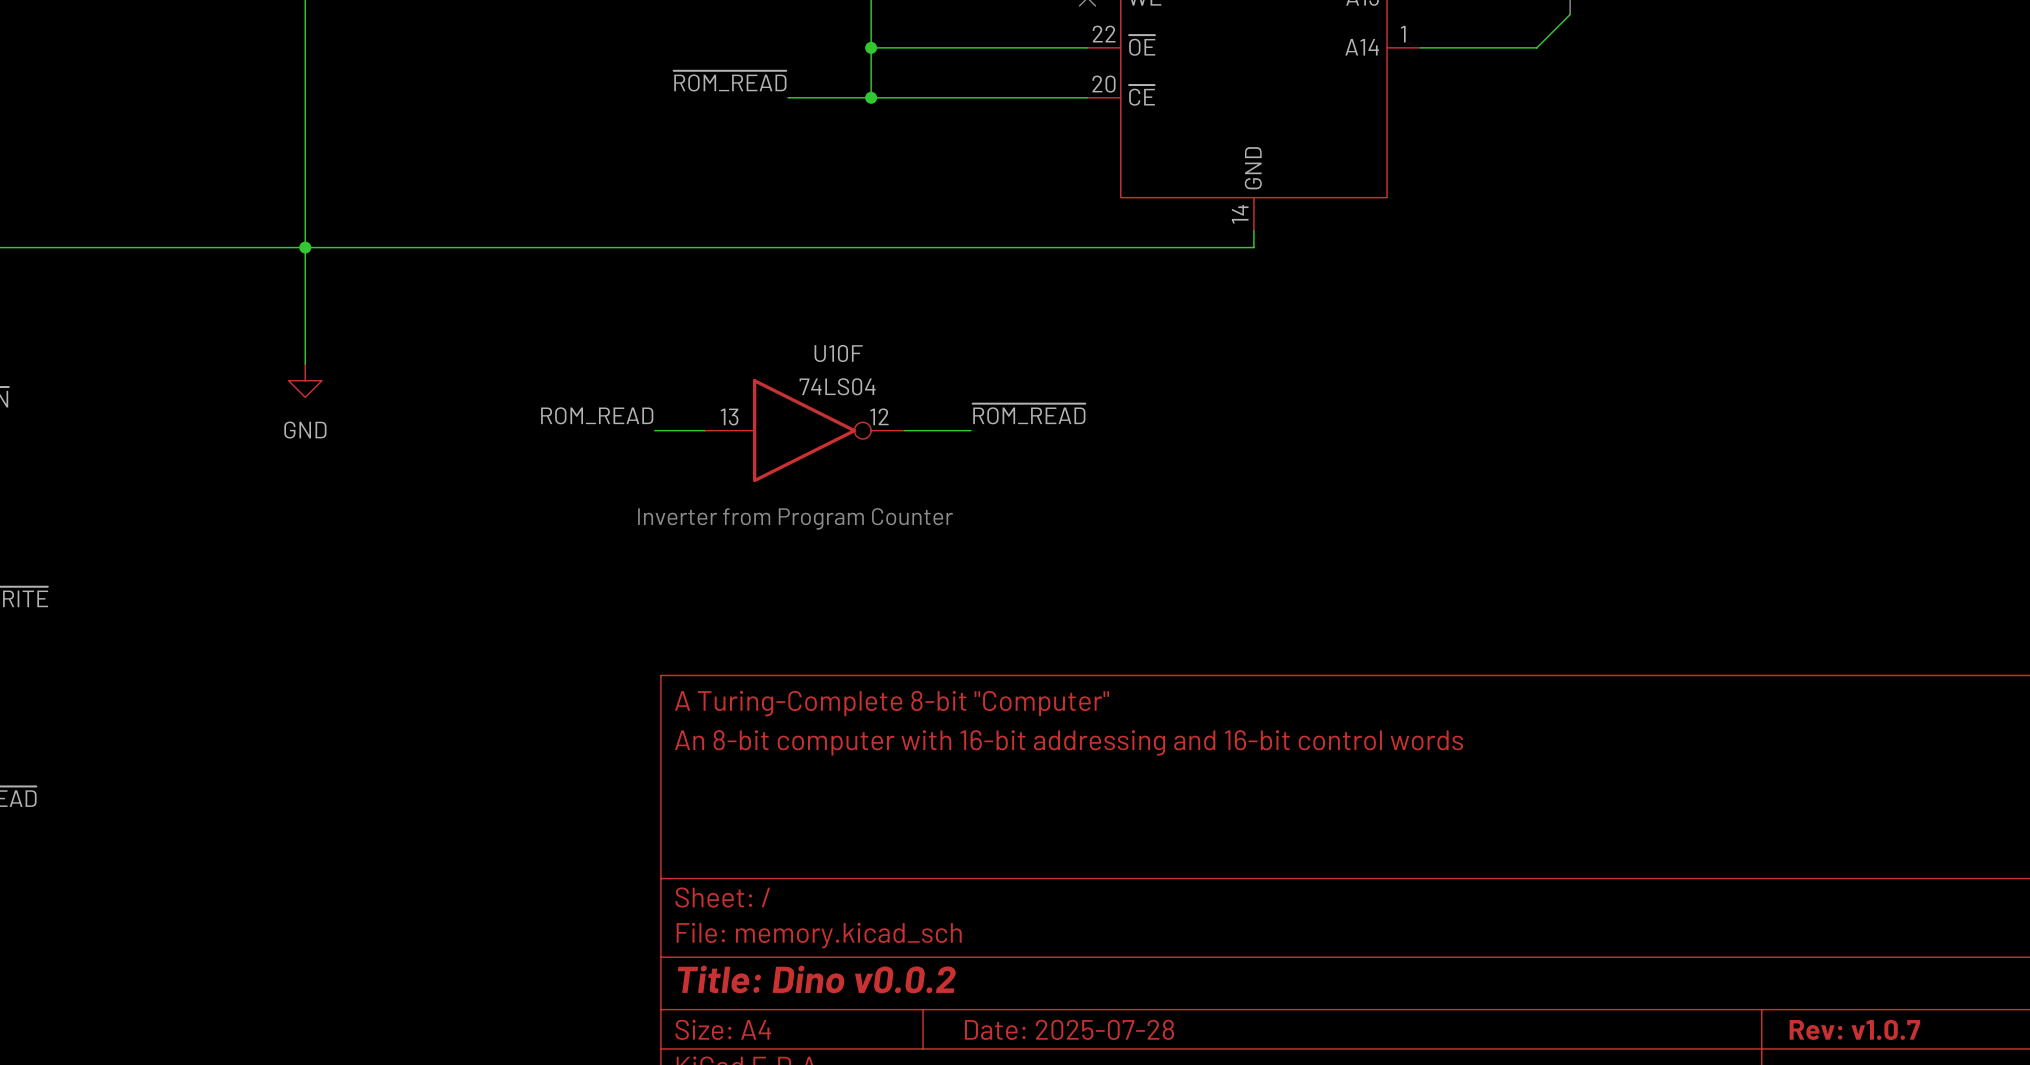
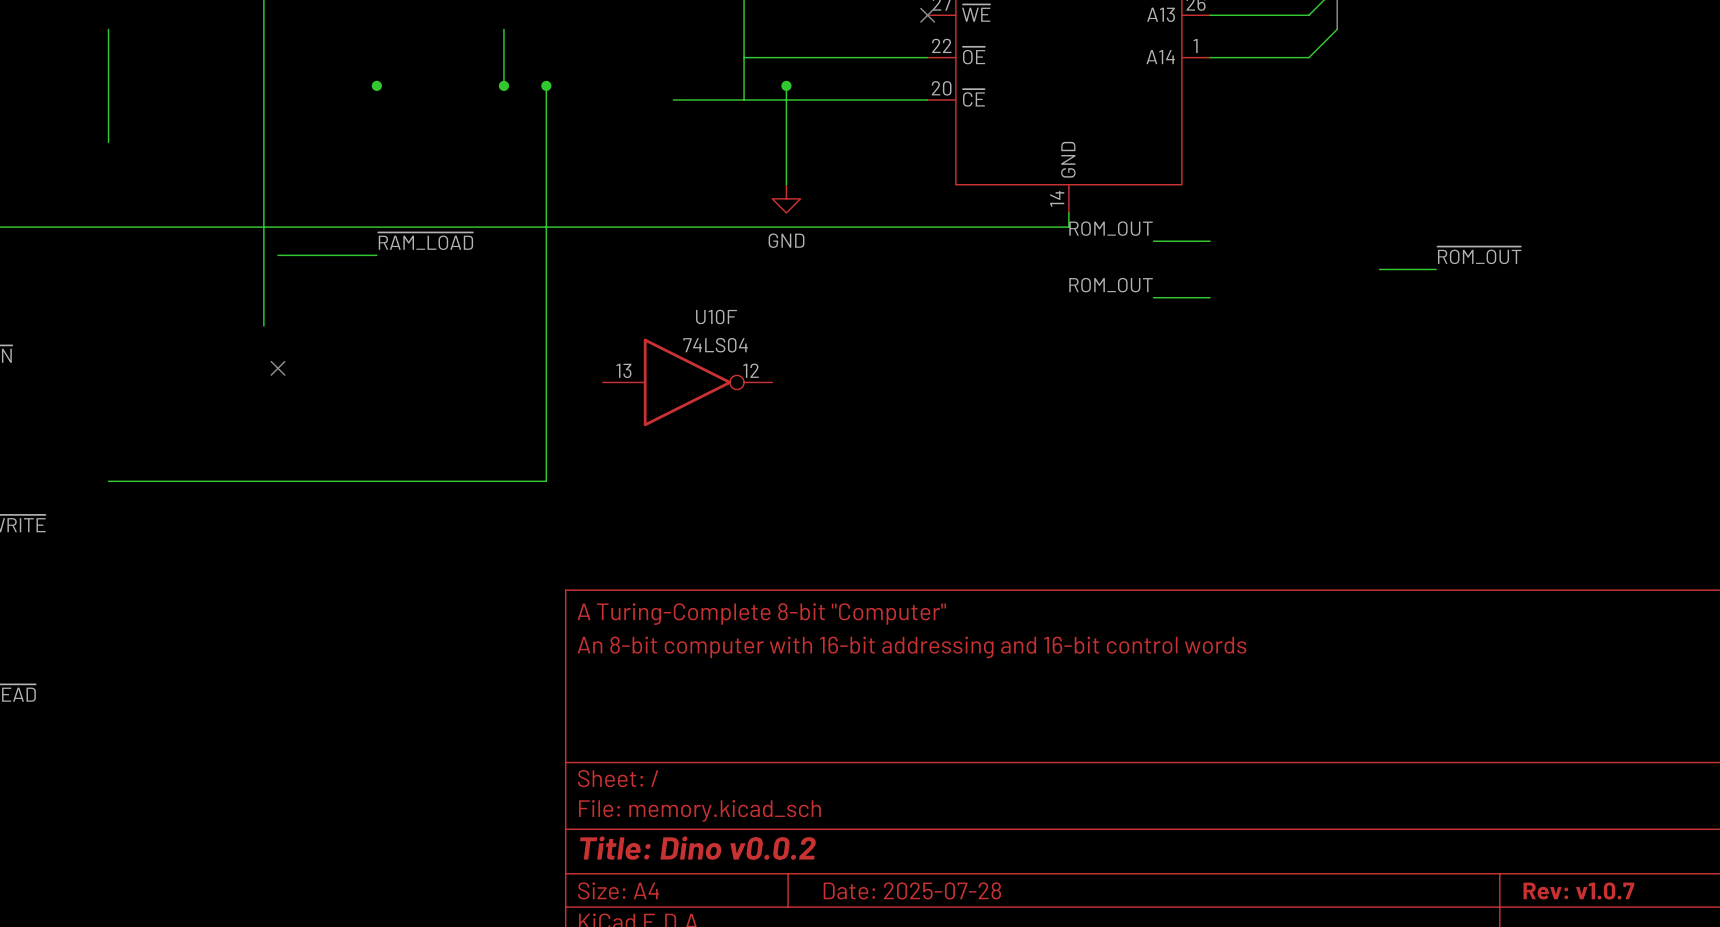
wire: none -> (108, 29) (108, 142)
wire: none -> (503, 29) (503, 85)
junction: (871, 47) -> none
junction: none -> (376, 85)
junction: none -> (503, 85)
wire: none -> (546, 85) (546, 481) (108, 481)
junction: none -> (546, 85)
label: ~{ROM_READ} (730, 81) -> none
wire: none -> (786, 85) (786, 184)
junction: none -> (786, 85)
junction: (871, 97) -> none
power symbol: none -> GND (786, 198)
junction: (305, 247) -> none
label: none -> ROM_OUT (1111, 228)
label: none -> ~{RAM_LOAD} (425, 241)
wire: none -> (1153, 241) (1210, 241)
wire: none -> (277, 255) (376, 255)
label: none -> ~{ROM_OUT} (1479, 255)
wire: none -> (1379, 269) (1436, 269)
label: none -> ROM_OUT (1111, 285)
wire: none -> (1153, 297) (1210, 297)
power symbol: GND (305, 380) -> none
label: ~{ROM_READ} (1029, 413) -> none
no-connect mark: none -> (277, 368)
label: ROM_READ (597, 415) -> none
wire: (654, 430) (704, 430) -> none
wire: (904, 430) (970, 430) -> none
text: Inverter from Program Counter (795, 518) -> none

